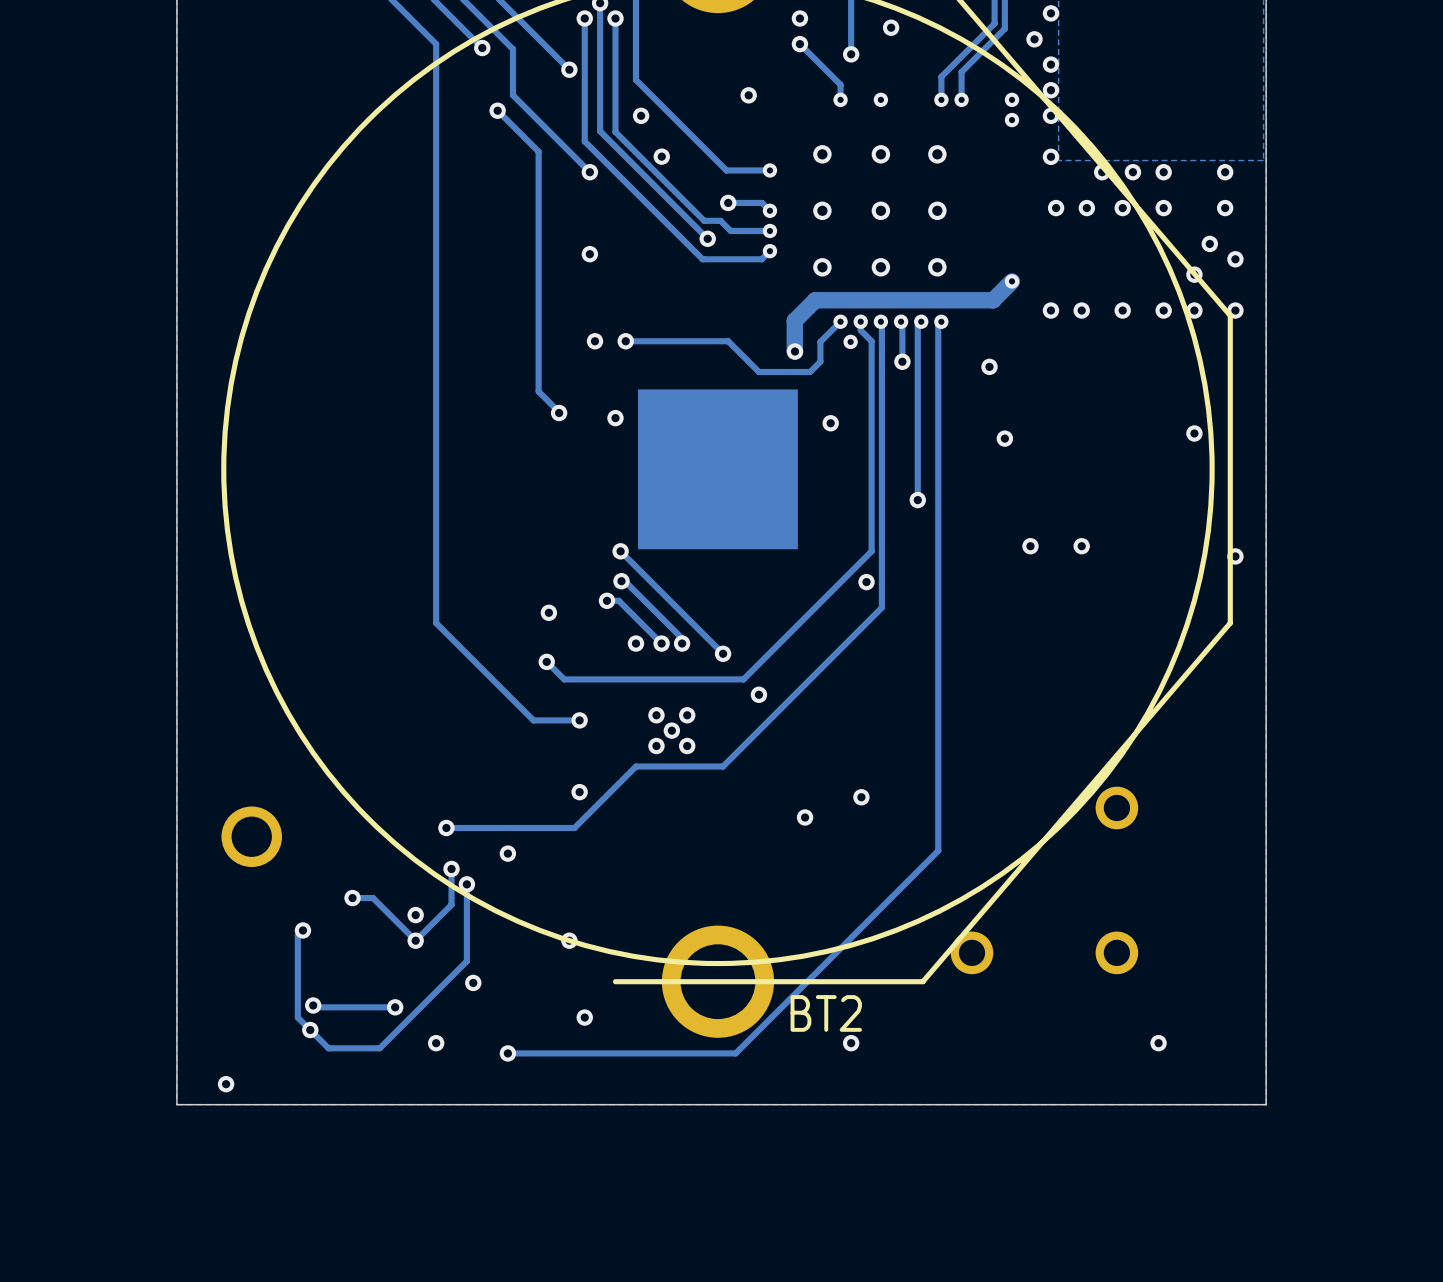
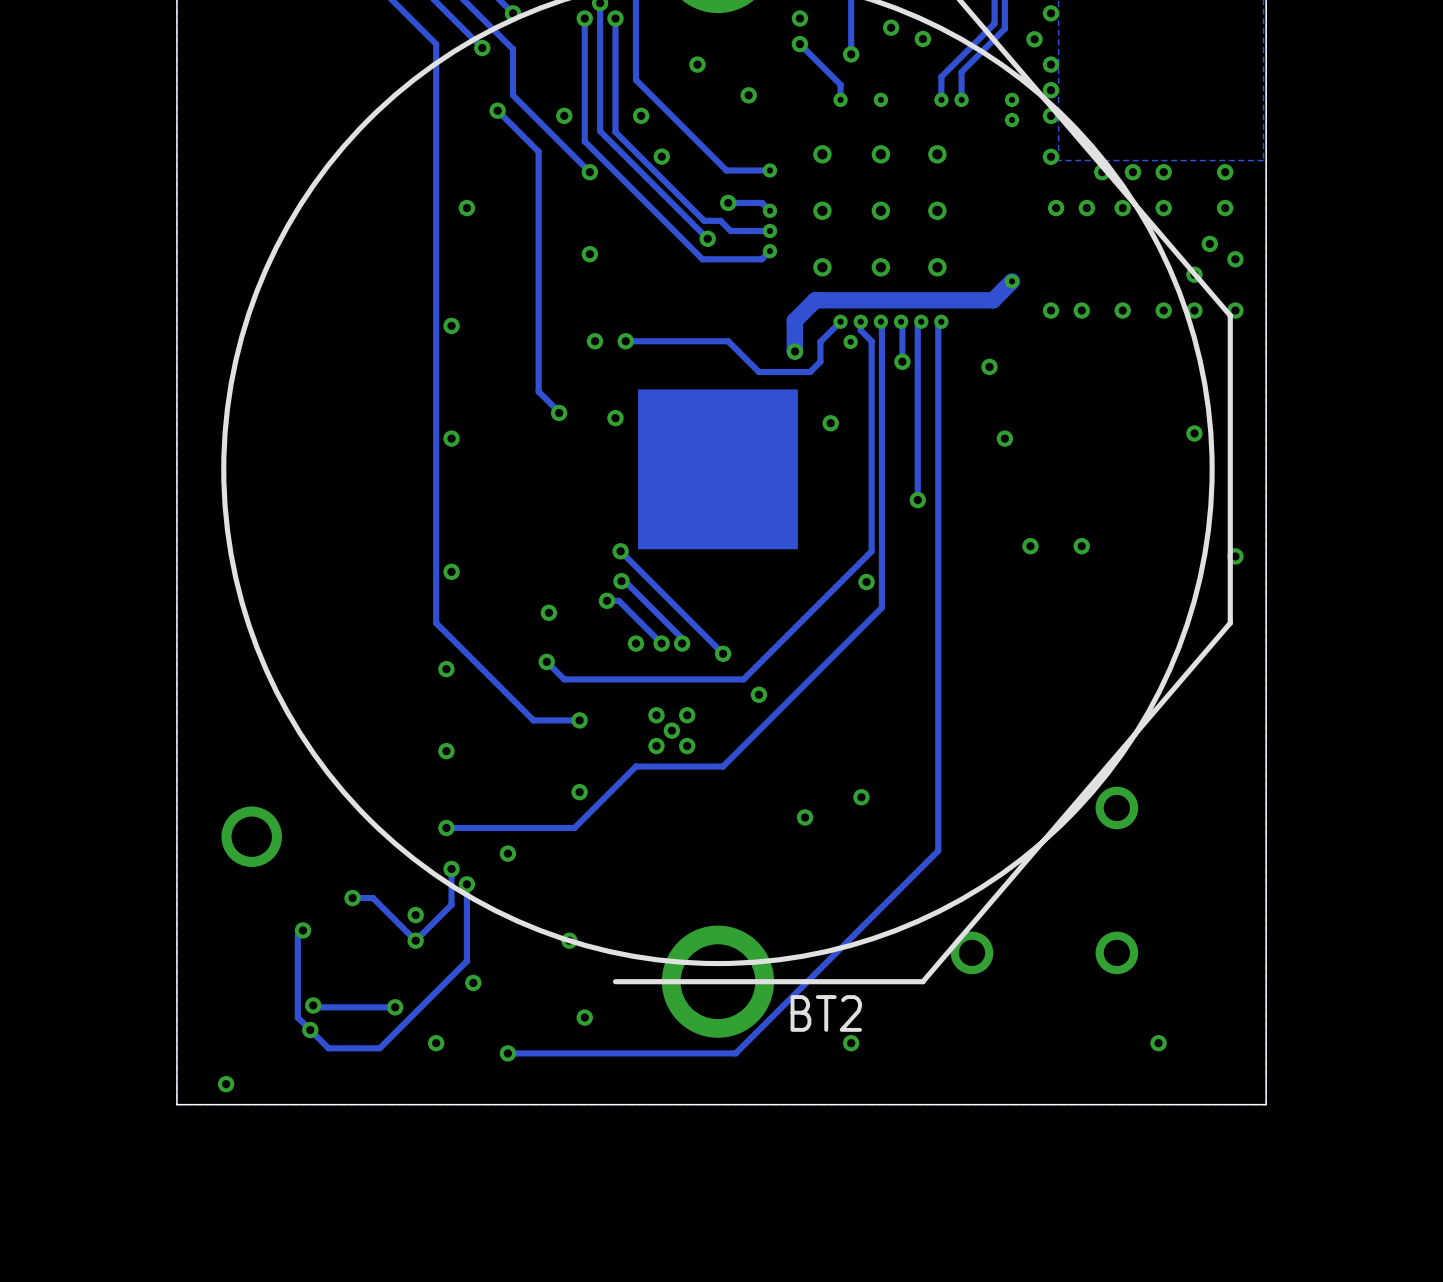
track: (513, 13) (569, 69) -> none
via: none -> (513, 13)
via: none -> (922, 38)
via: none -> (697, 64)
via: (569, 69) -> none
via: none -> (564, 115)
via: none -> (466, 208)
via: none -> (451, 325)
via: none -> (451, 438)
via: none -> (451, 571)
via: none -> (446, 669)
via: none -> (446, 751)

